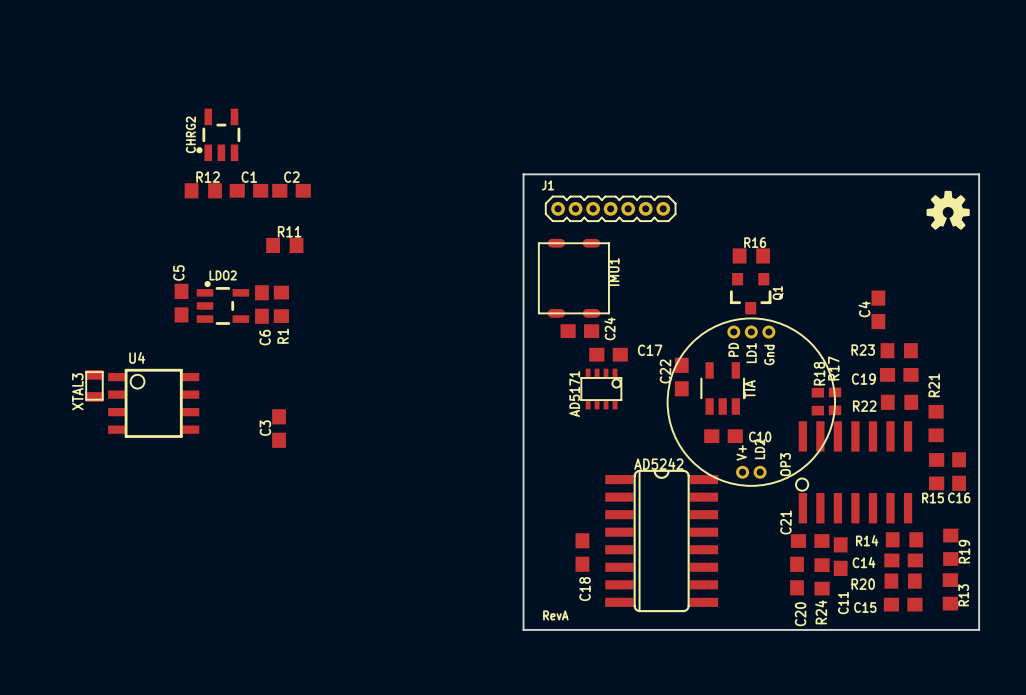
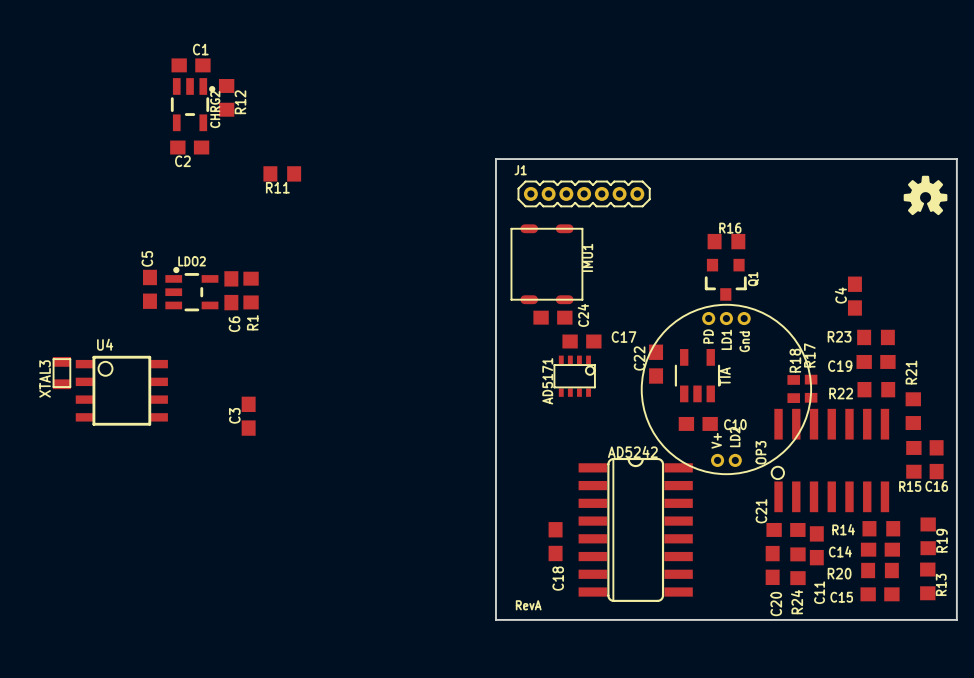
CHRG2 rotation: 0° (218, 134) -> 180° (193, 104)
C1 name position: C1 (249, 177) -> C1 (200, 49)
C2 name position: C2 (291, 177) -> C2 (182, 161)
R12 rotation: 0° (203, 190) -> 90° clockwise (226, 97)
R12 position: (203, 190) -> (226, 97)
C1 position: (248, 190) -> (191, 65)
C2 position: (291, 190) -> (189, 147)
R11 name position: R11 (289, 231) -> R11 (277, 187)
R11 position: (284, 245) -> (282, 173)

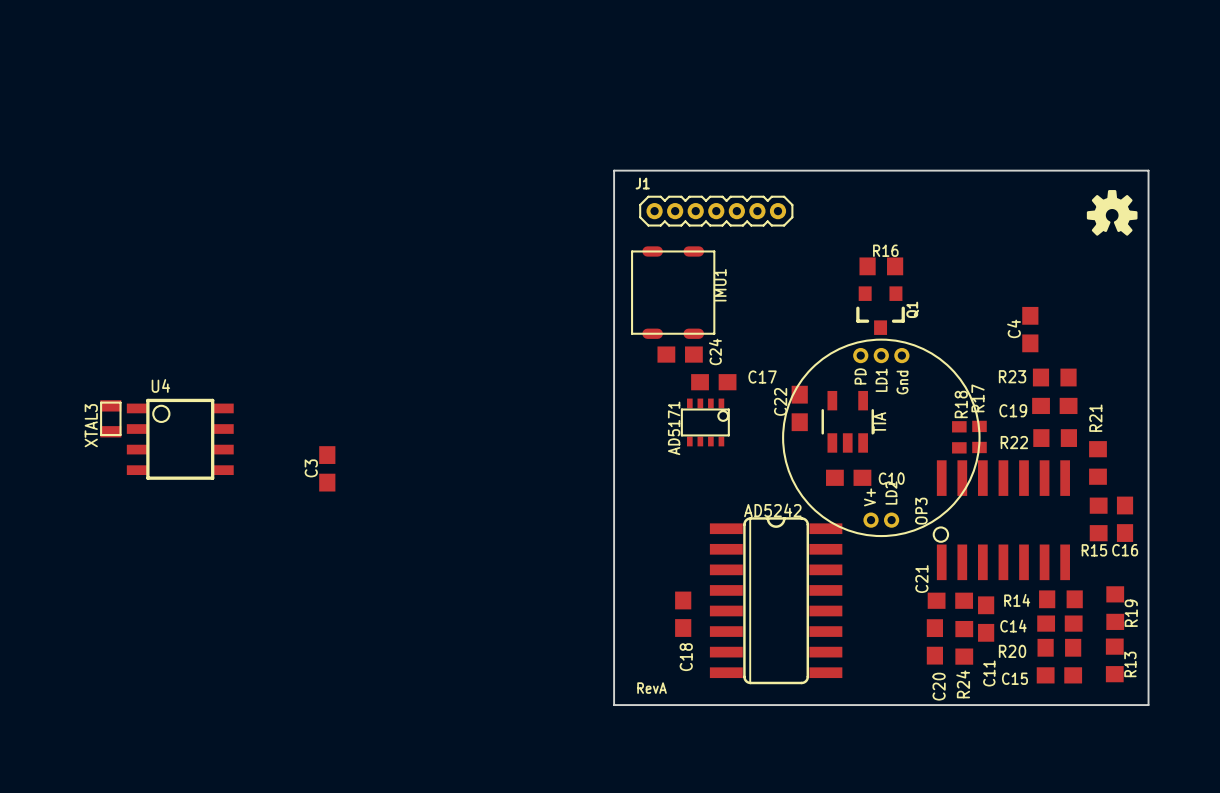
C1: (191, 65) -> none
R12: (226, 97) -> none
CHRG2: (193, 104) -> none
C2: (189, 147) -> none
R11: (282, 173) -> none
C5: (149, 289) -> none
LDO2: (191, 289) -> none
C6: (231, 290) -> none
R1: (251, 290) -> none

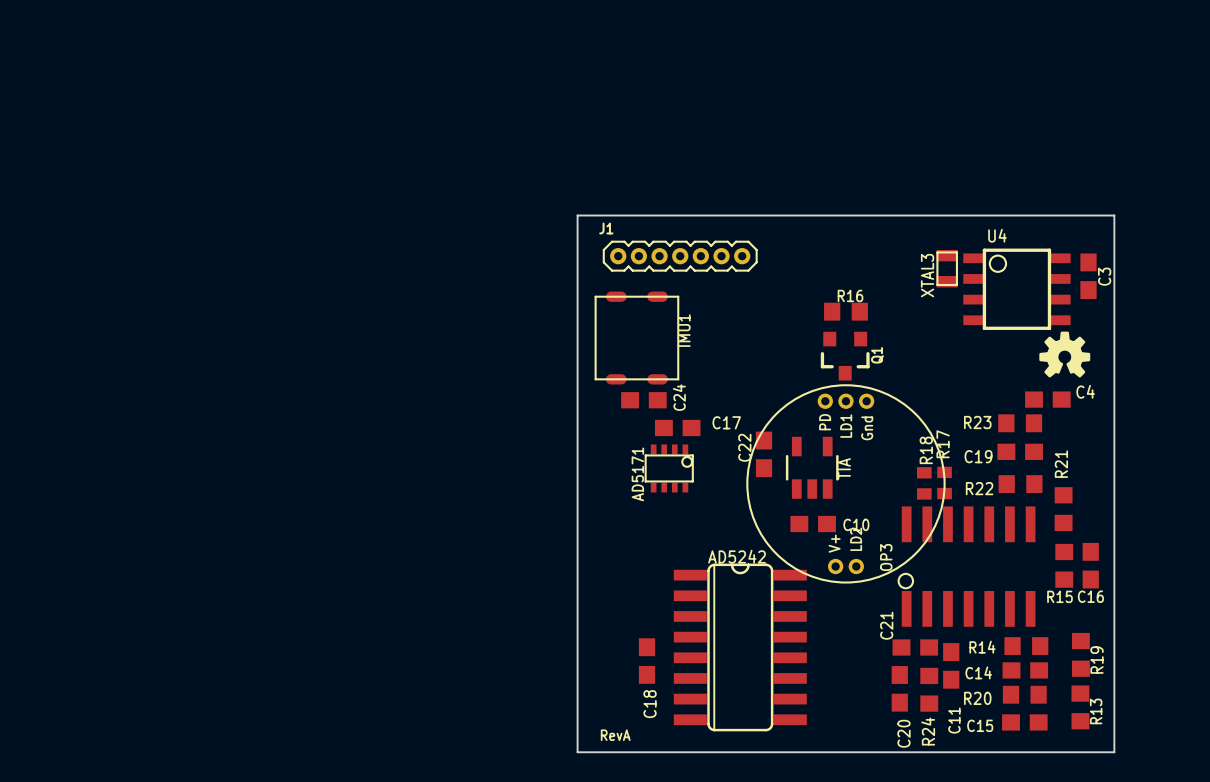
drawing position: (1112, 212) -> (1064, 354)
C4 name position: C4 (1014, 328) -> C4 (1085, 391)
C4 rotation: 0° (1030, 329) -> 90° clockwise (1047, 399)
C4 position: (1030, 329) -> (1047, 399)
XTAL3 position: (110, 418) -> (947, 268)
U4 position: (180, 439) -> (1016, 289)
C3 name position: C3 (311, 468) -> C3 (1104, 276)
C3 position: (327, 468) -> (1088, 276)

